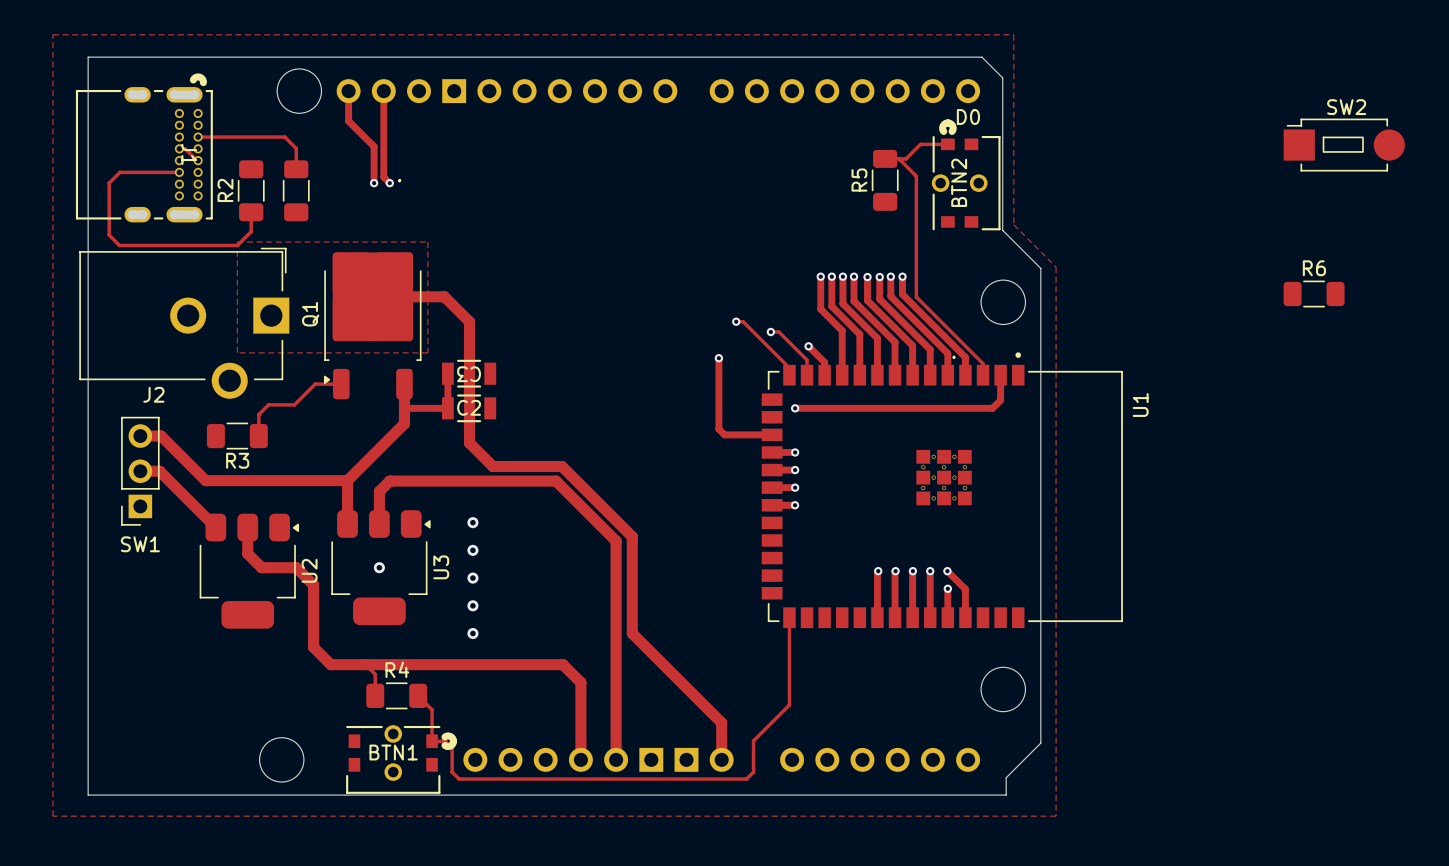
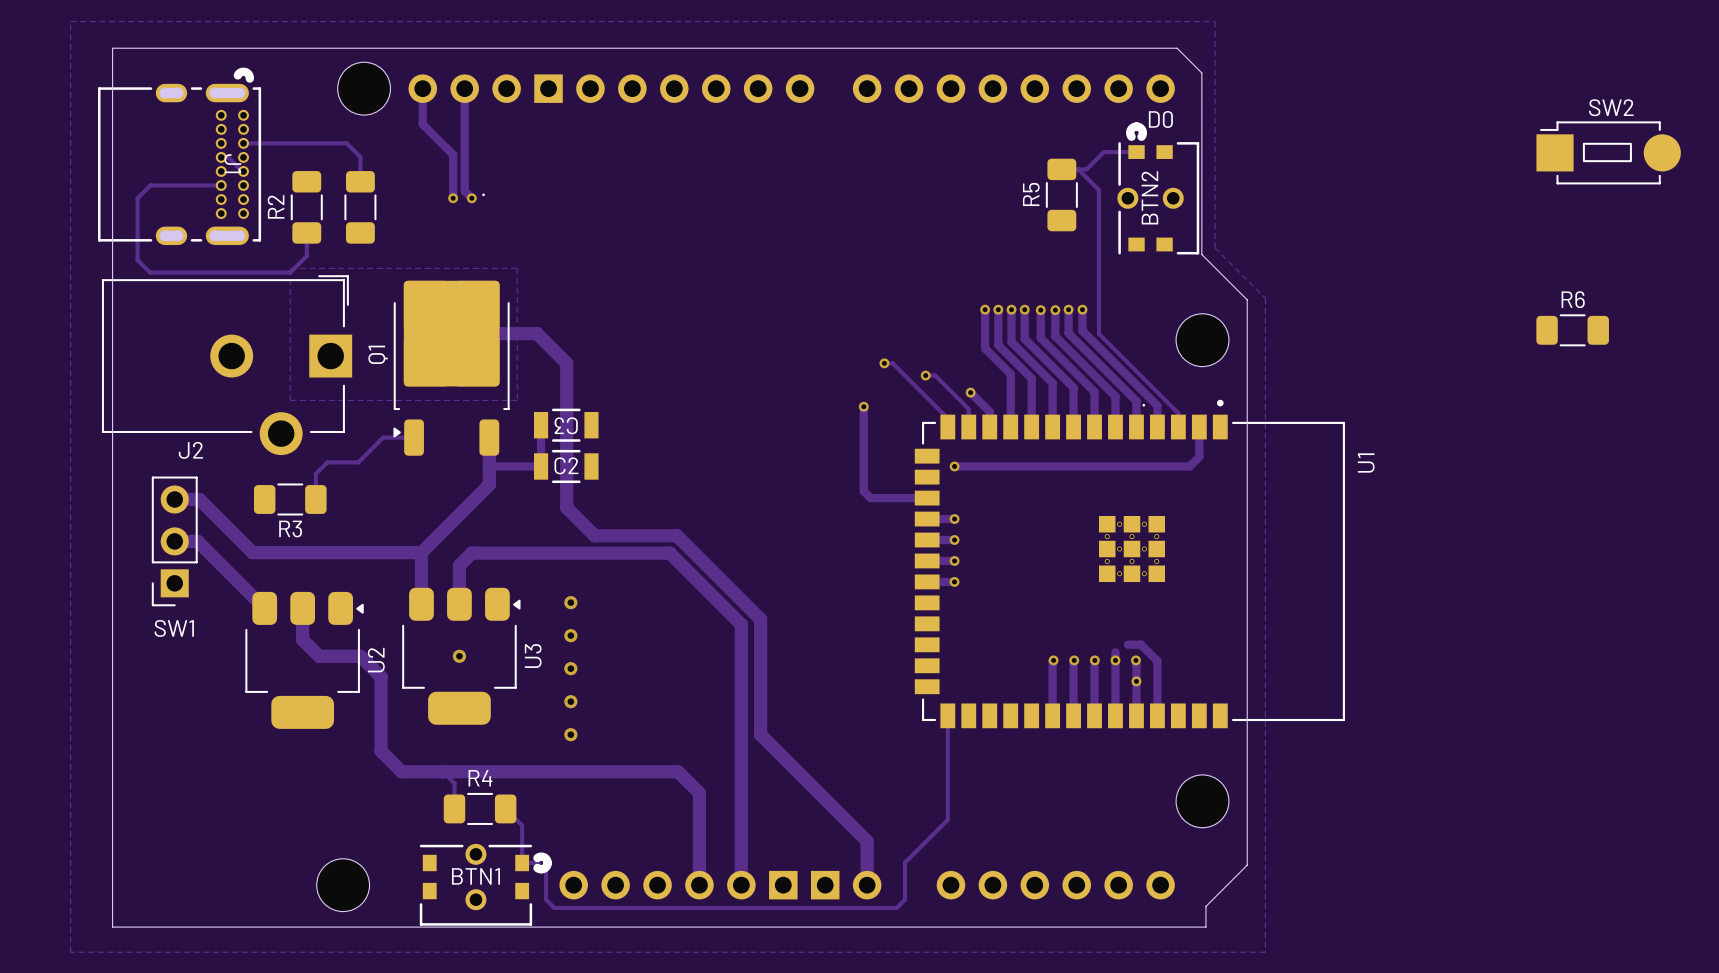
track: none -> (1115, 652) (1115, 660)
track: (947, 571) (965, 589) -> (1127, 644) (1141, 644) (1157, 661) (1157, 681)
track: none -> (1136, 665) (1136, 681)

